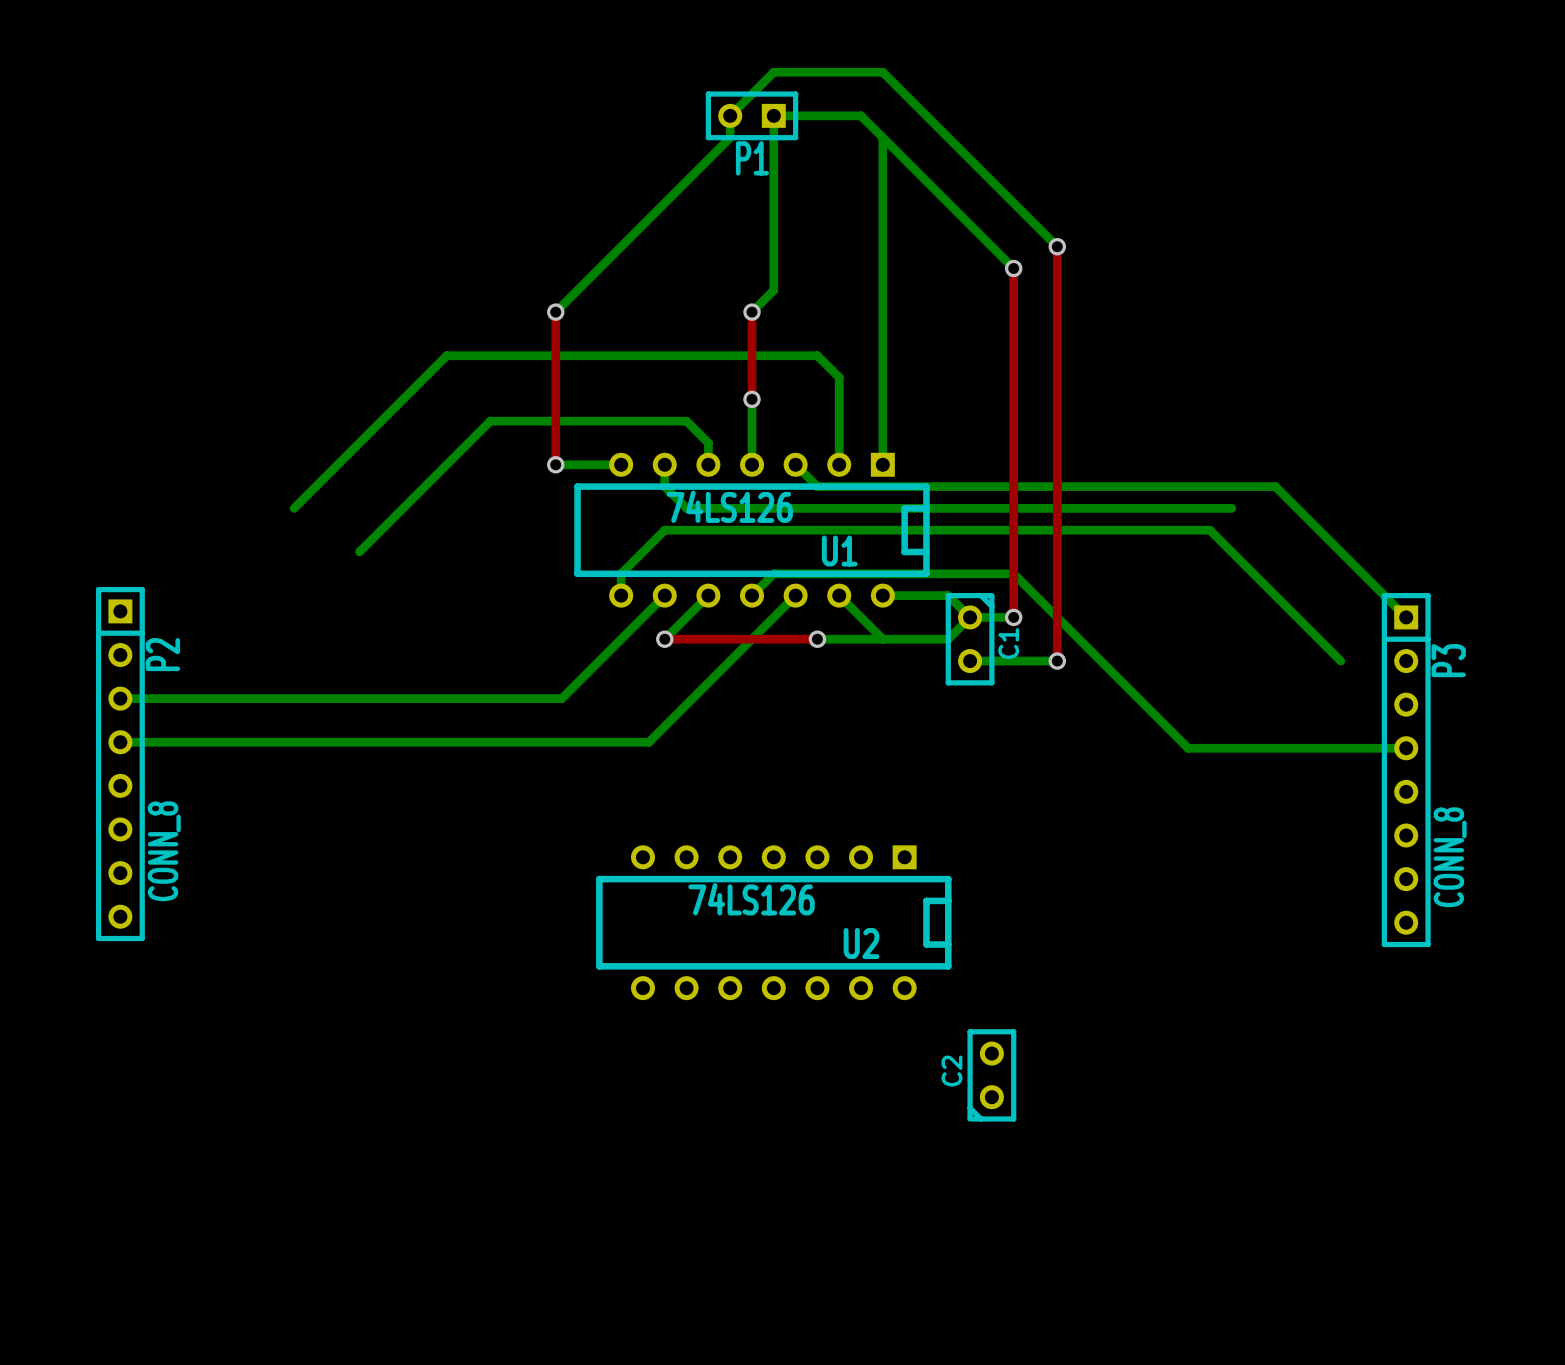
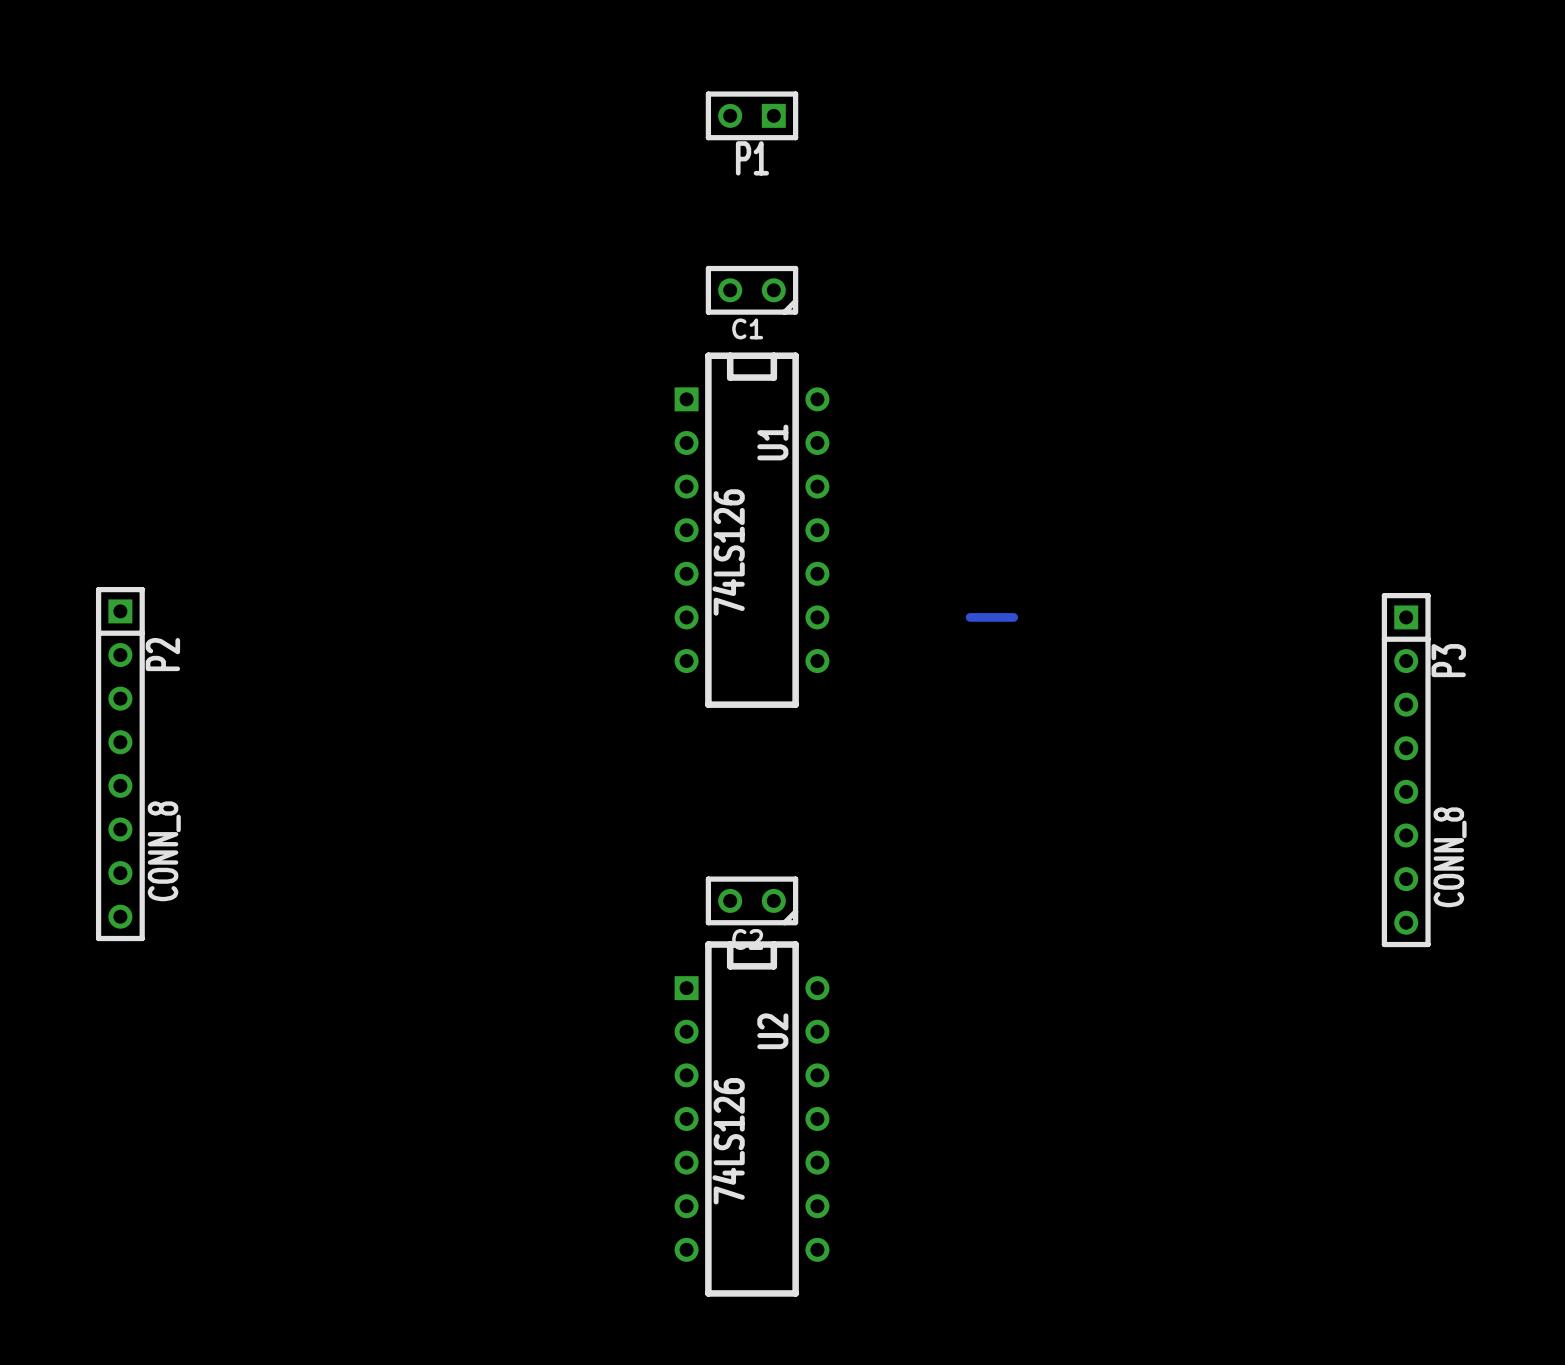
bottom track: (882, 137) (882, 464) -> none
bottom track: (1057, 246) (882, 72) (773, 72) (730, 115) (730, 137) (555, 312) -> none
top track: (1057, 246) (1057, 661) -> none
via: (1057, 246) -> none
bottom track: (1013, 268) (861, 115) (773, 115) (773, 290) (752, 312) -> none
top track: (1013, 268) (1013, 617) -> none
via: (1013, 268) -> none
top track: (555, 312) (555, 464) -> none
via: (555, 312) -> none
top track: (752, 312) (752, 399) -> none
via: (752, 312) -> none
bottom track: (752, 399) (752, 464) -> none
via: (752, 399) -> none
bottom track: (555, 464) (621, 464) -> none
via: (555, 464) -> none
bottom track: (664, 464) (664, 486) (686, 508) (1231, 508) -> none
bottom track: (708, 464) (708, 442) (686, 421) (490, 421) (359, 552) -> none
bottom track: (795, 464) (817, 486) (1275, 486) (1406, 617) -> none
bottom track: (839, 464) (839, 377) (817, 355) (446, 355) (294, 508) -> none
U1 rotation: 0° (752, 530) -> 90° counterclockwise (752, 530)
bottom track: (621, 595) (621, 573) (664, 530) (1209, 530) (1340, 661) -> none
bottom track: (664, 595) (561, 698) (120, 698) -> none
bottom track: (708, 595) (664, 639) -> none
bottom track: (752, 595) (773, 573) (1013, 573) (1188, 748) (1406, 748) -> none
bottom track: (795, 595) (648, 742) (120, 742) -> none
bottom track: (839, 595) (882, 639) -> none
bottom track: (882, 595) (948, 595) (970, 617) (948, 639) (817, 639) -> none
via: (1013, 617) -> none
top track: (664, 639) (817, 639) -> none
via: (664, 639) -> none
via: (817, 639) -> none
C1 rotation: 0° (970, 639) -> 90° clockwise (752, 290)
C1 position: (970, 639) -> (752, 290)
bottom track: (970, 661) (1057, 661) -> none
via: (1057, 661) -> none
U2 rotation: 0° (773, 922) -> 90° counterclockwise (752, 1118)
C2 rotation: 0° (991, 1075) -> 90° counterclockwise (752, 900)
C2 position: (991, 1075) -> (752, 900)

